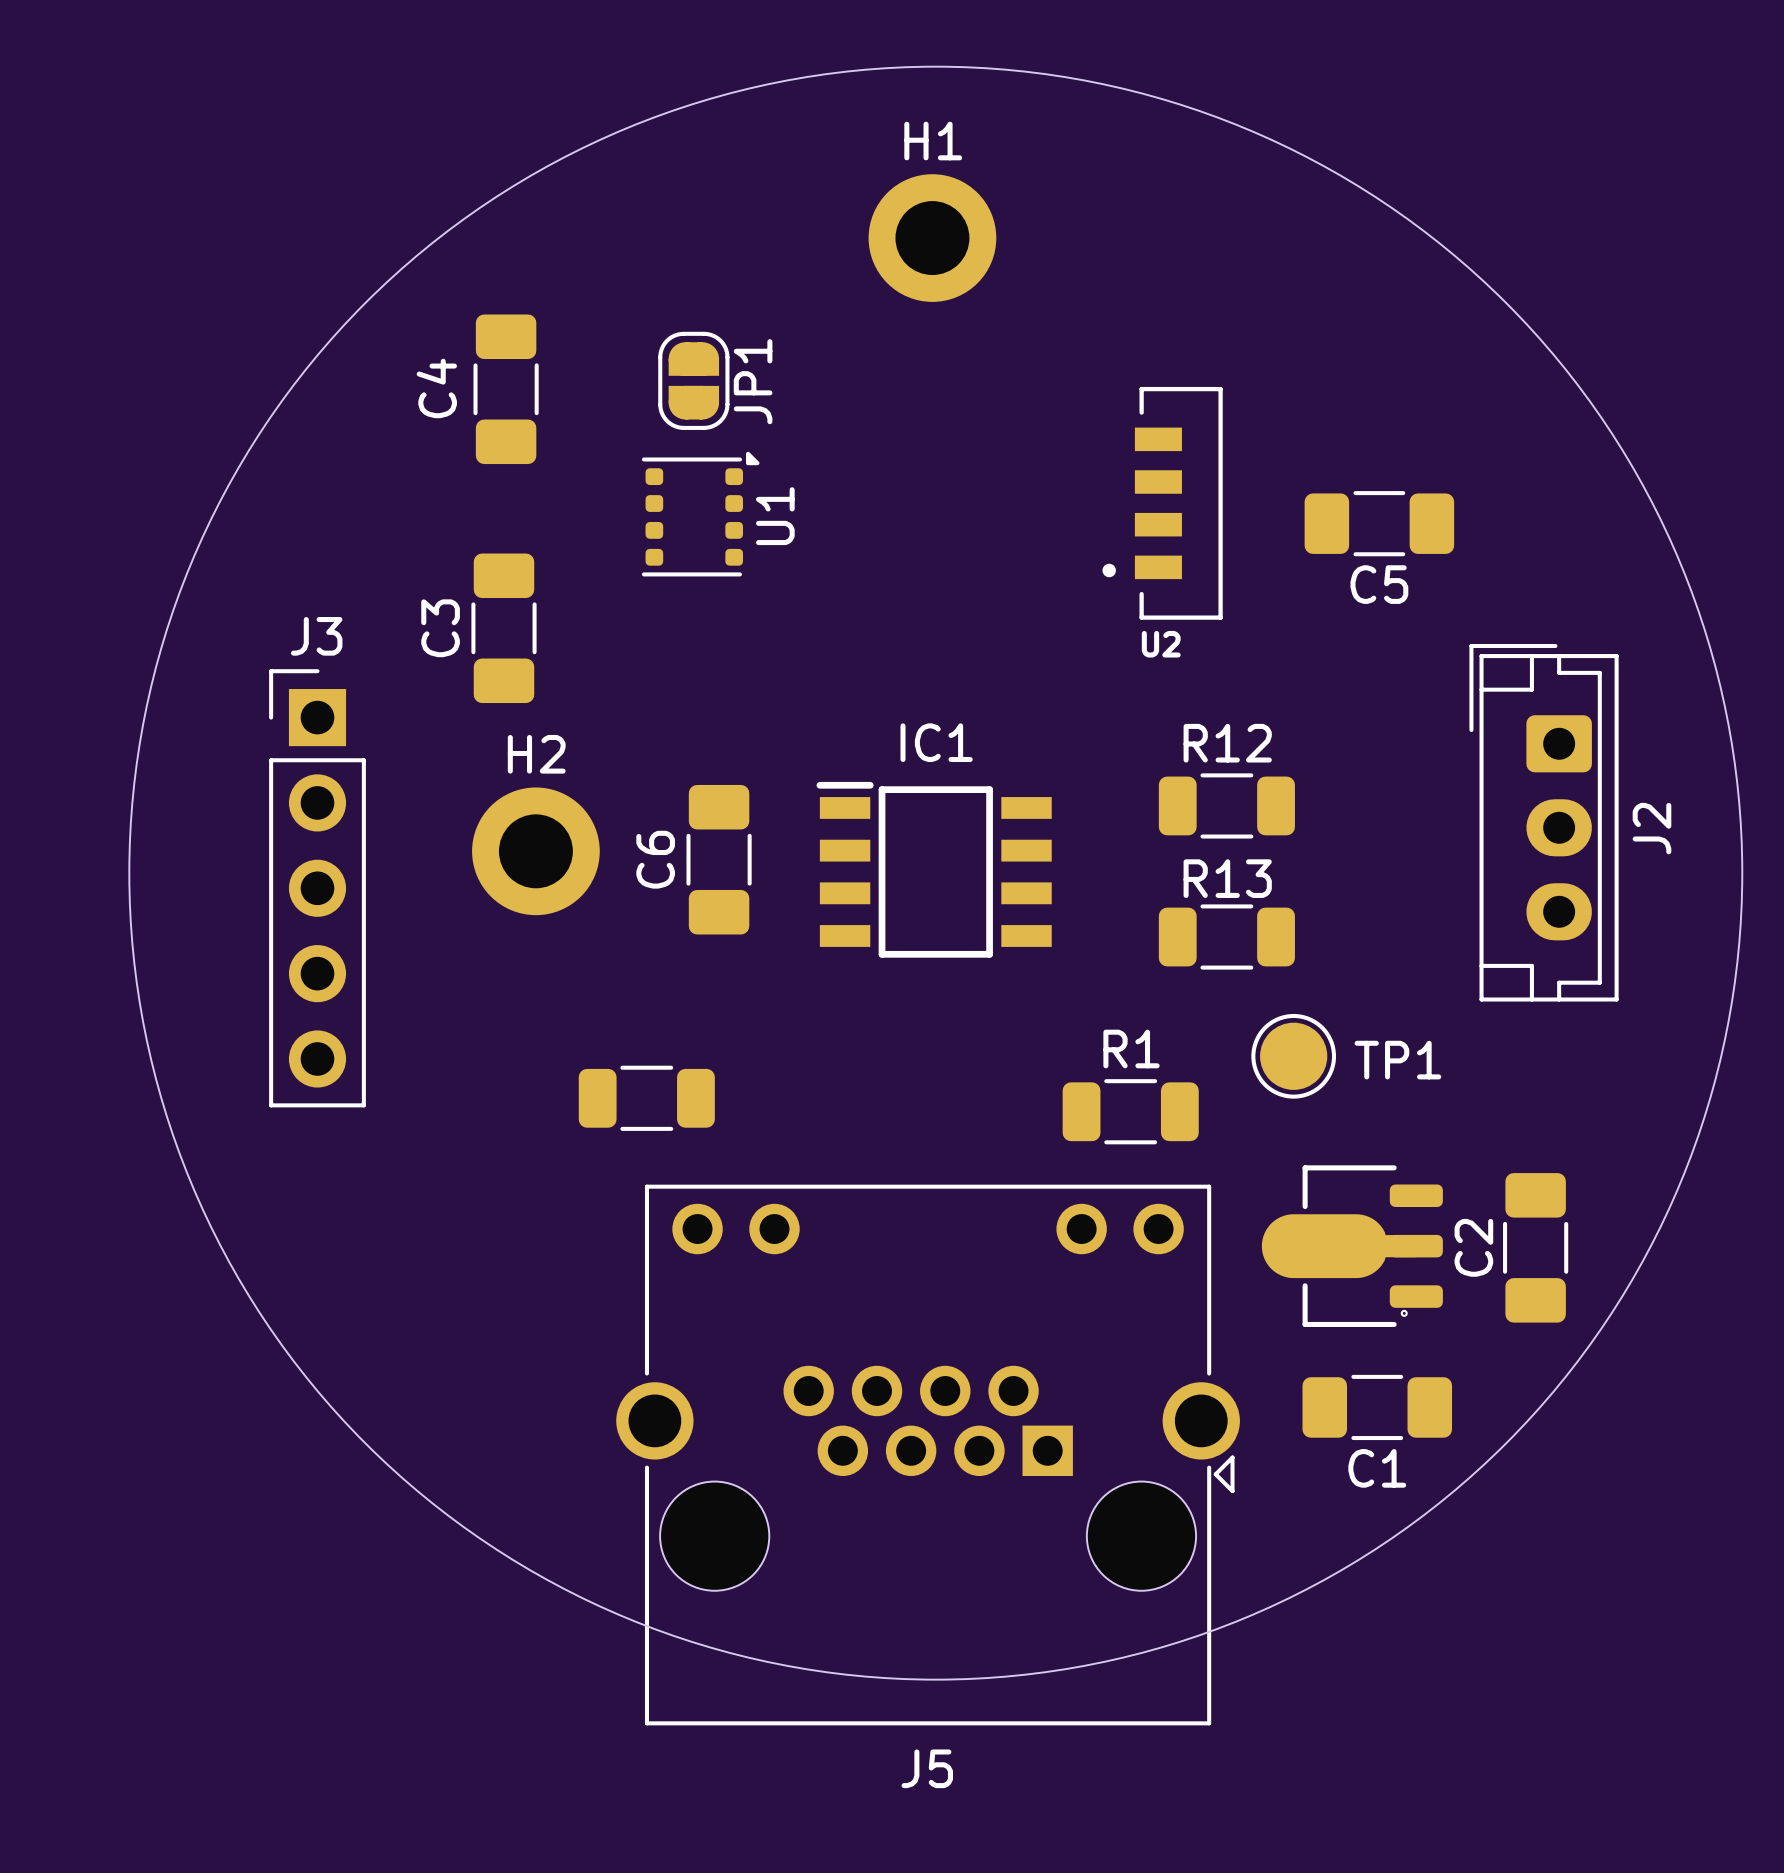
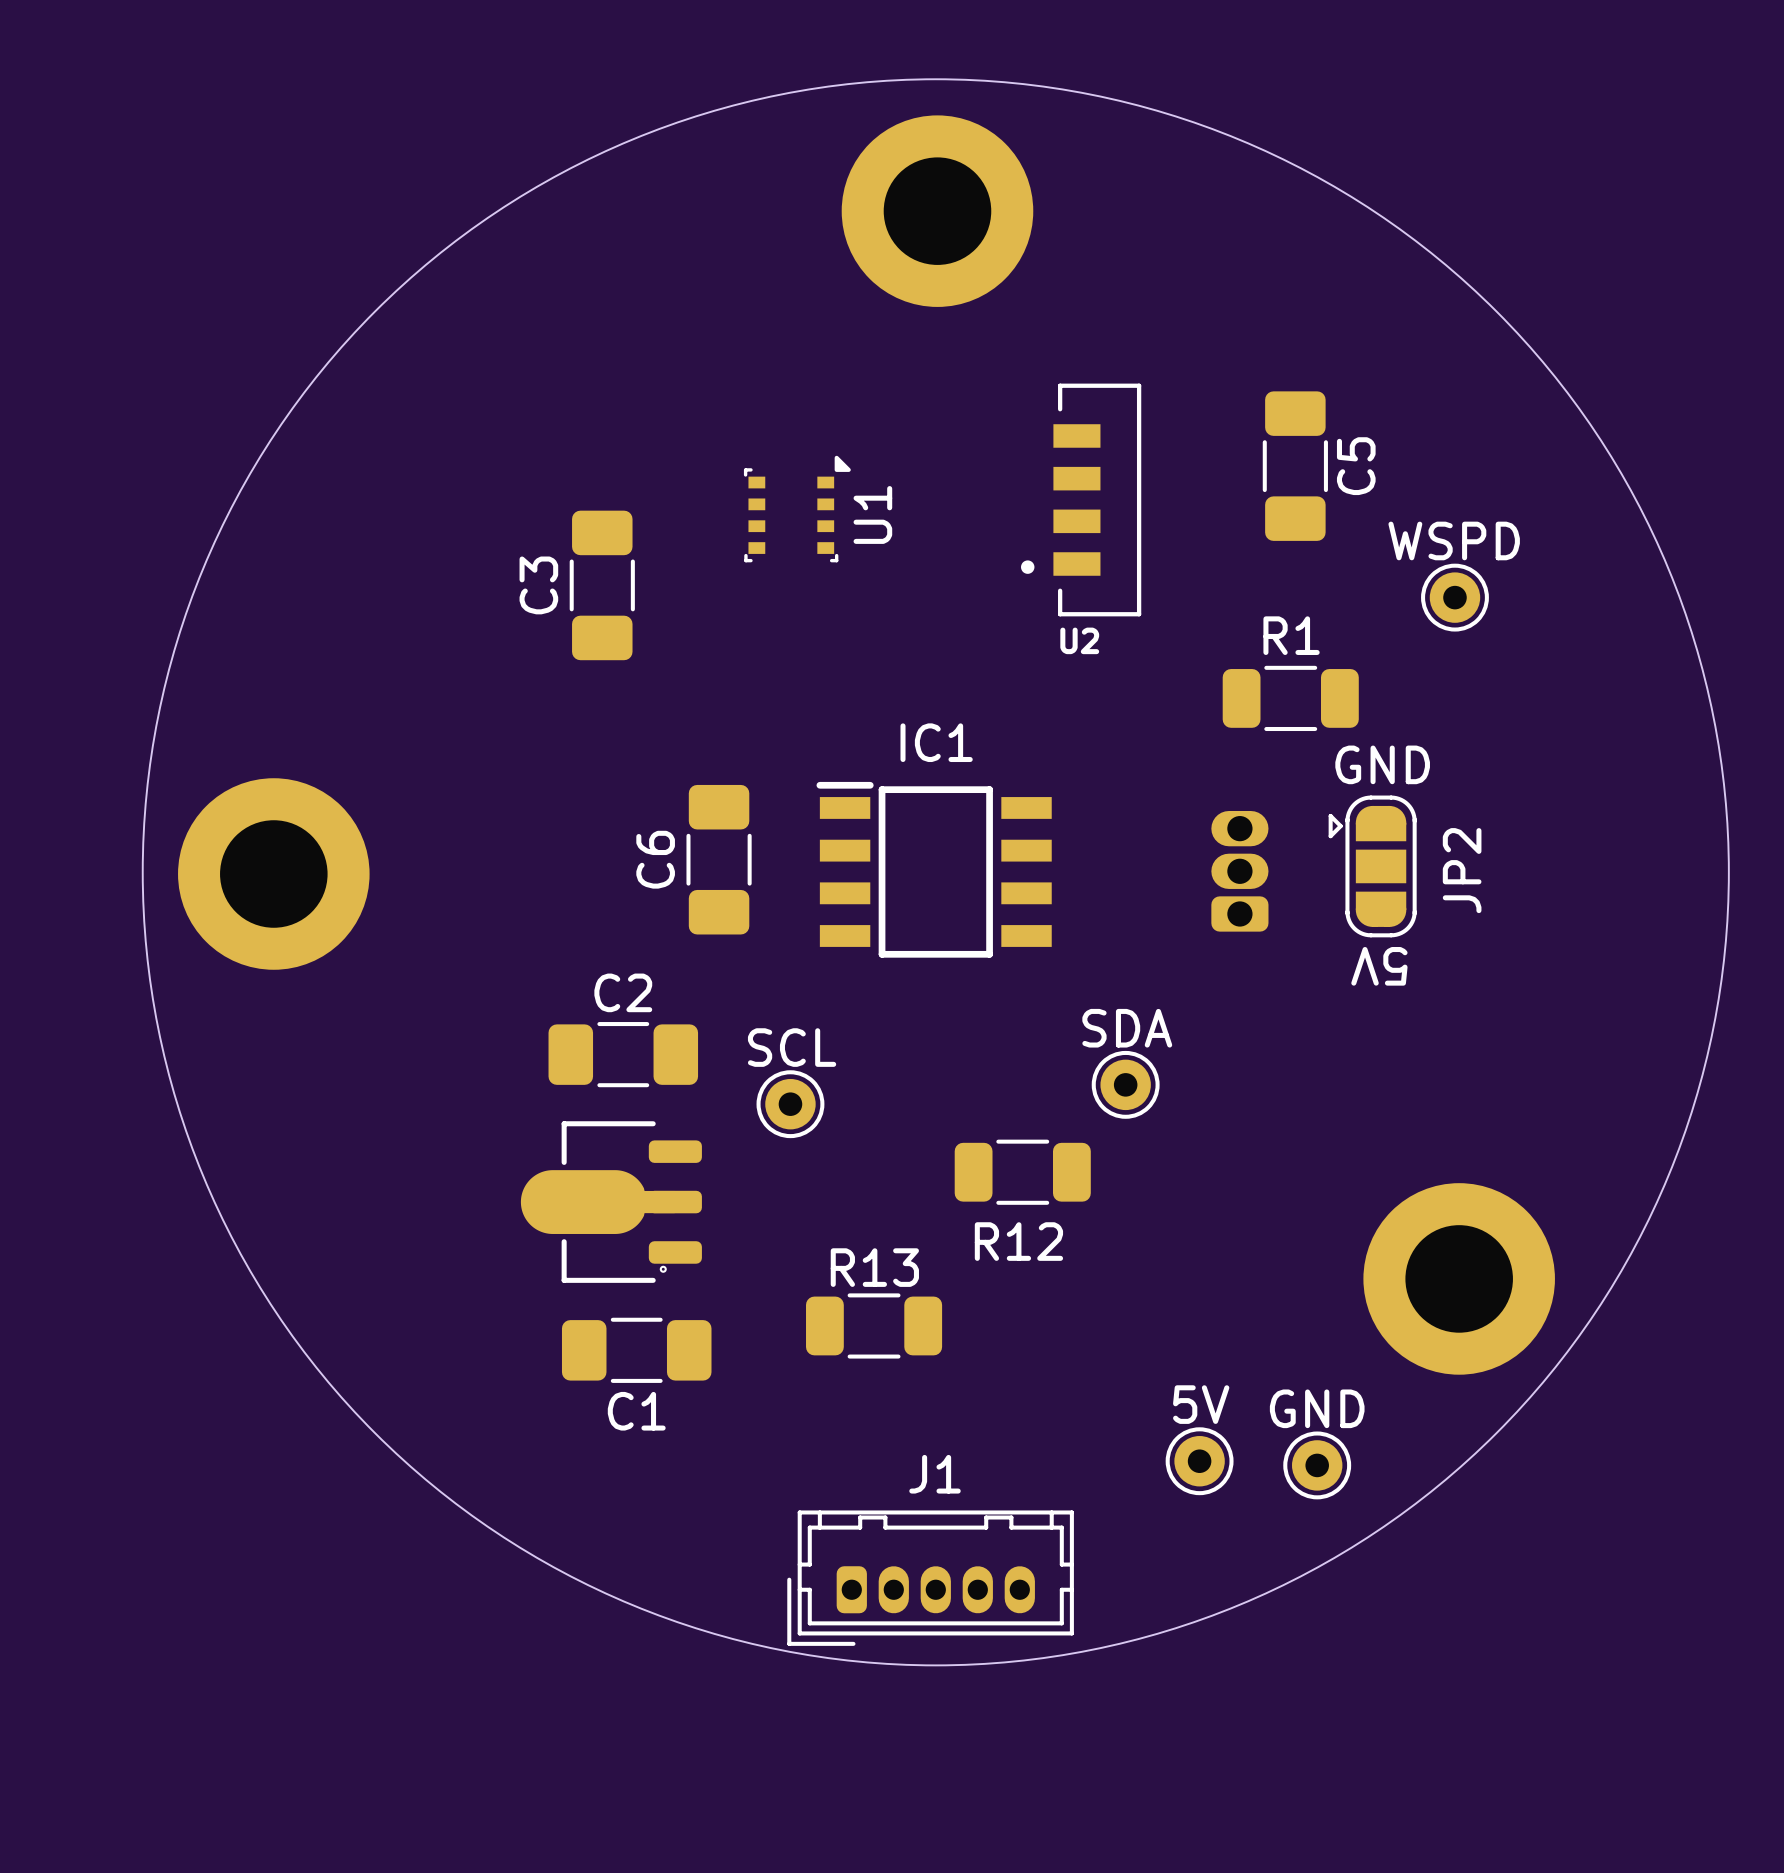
round board edge size: [128, 65, 1744, 1681] -> [141, 78, 1730, 1667]
part: none -> (937, 211)
H1: (932, 238) -> none
JP1: (693, 380) -> none
C4: (506, 389) -> none
U1 footprint: [641, 451, 760, 577] -> [743, 455, 851, 563]
U2 position: (1162, 503) -> (1081, 499)
C5 rotation: 0° (1379, 523) -> 90° clockwise (1295, 466)
C5 position: (1379, 523) -> (1295, 466)
C5 name position: C5 (1379, 584) -> C5 (1356, 466)
WSPD: none -> (1454, 597)
C3 position: (503, 628) -> (602, 585)
R12 name position: R12 (1227, 743) -> R12 (1018, 1241)
text: none -> GND (1382, 764)
R12 position: (1226, 805) -> (1022, 1172)
J2: (1544, 822) -> none
H2: (535, 851) -> none
JP2: none -> (1372, 866)
part: none -> (1239, 871)
part: none -> (273, 874)
J3: (317, 888) -> none
R13 position: (1226, 937) -> (874, 1325)
text: none -> 5V (1379, 966)
TP1: (1293, 1056) -> none
SDA: none -> (1125, 1084)
part: (646, 1098) -> none
SCL: none -> (790, 1104)
R1 position: (1130, 1111) -> (1290, 698)
part position: (1352, 1246) -> (611, 1202)
C2 rotation: 0° (1535, 1247) -> 90° clockwise (623, 1054)
C2 position: (1535, 1247) -> (623, 1054)
part: none -> (1459, 1278)
C1 position: (1377, 1407) -> (636, 1350)
J5: (928, 1455) -> none
5V: none -> (1199, 1461)
GND: none -> (1317, 1465)
J1: none -> (930, 1578)

